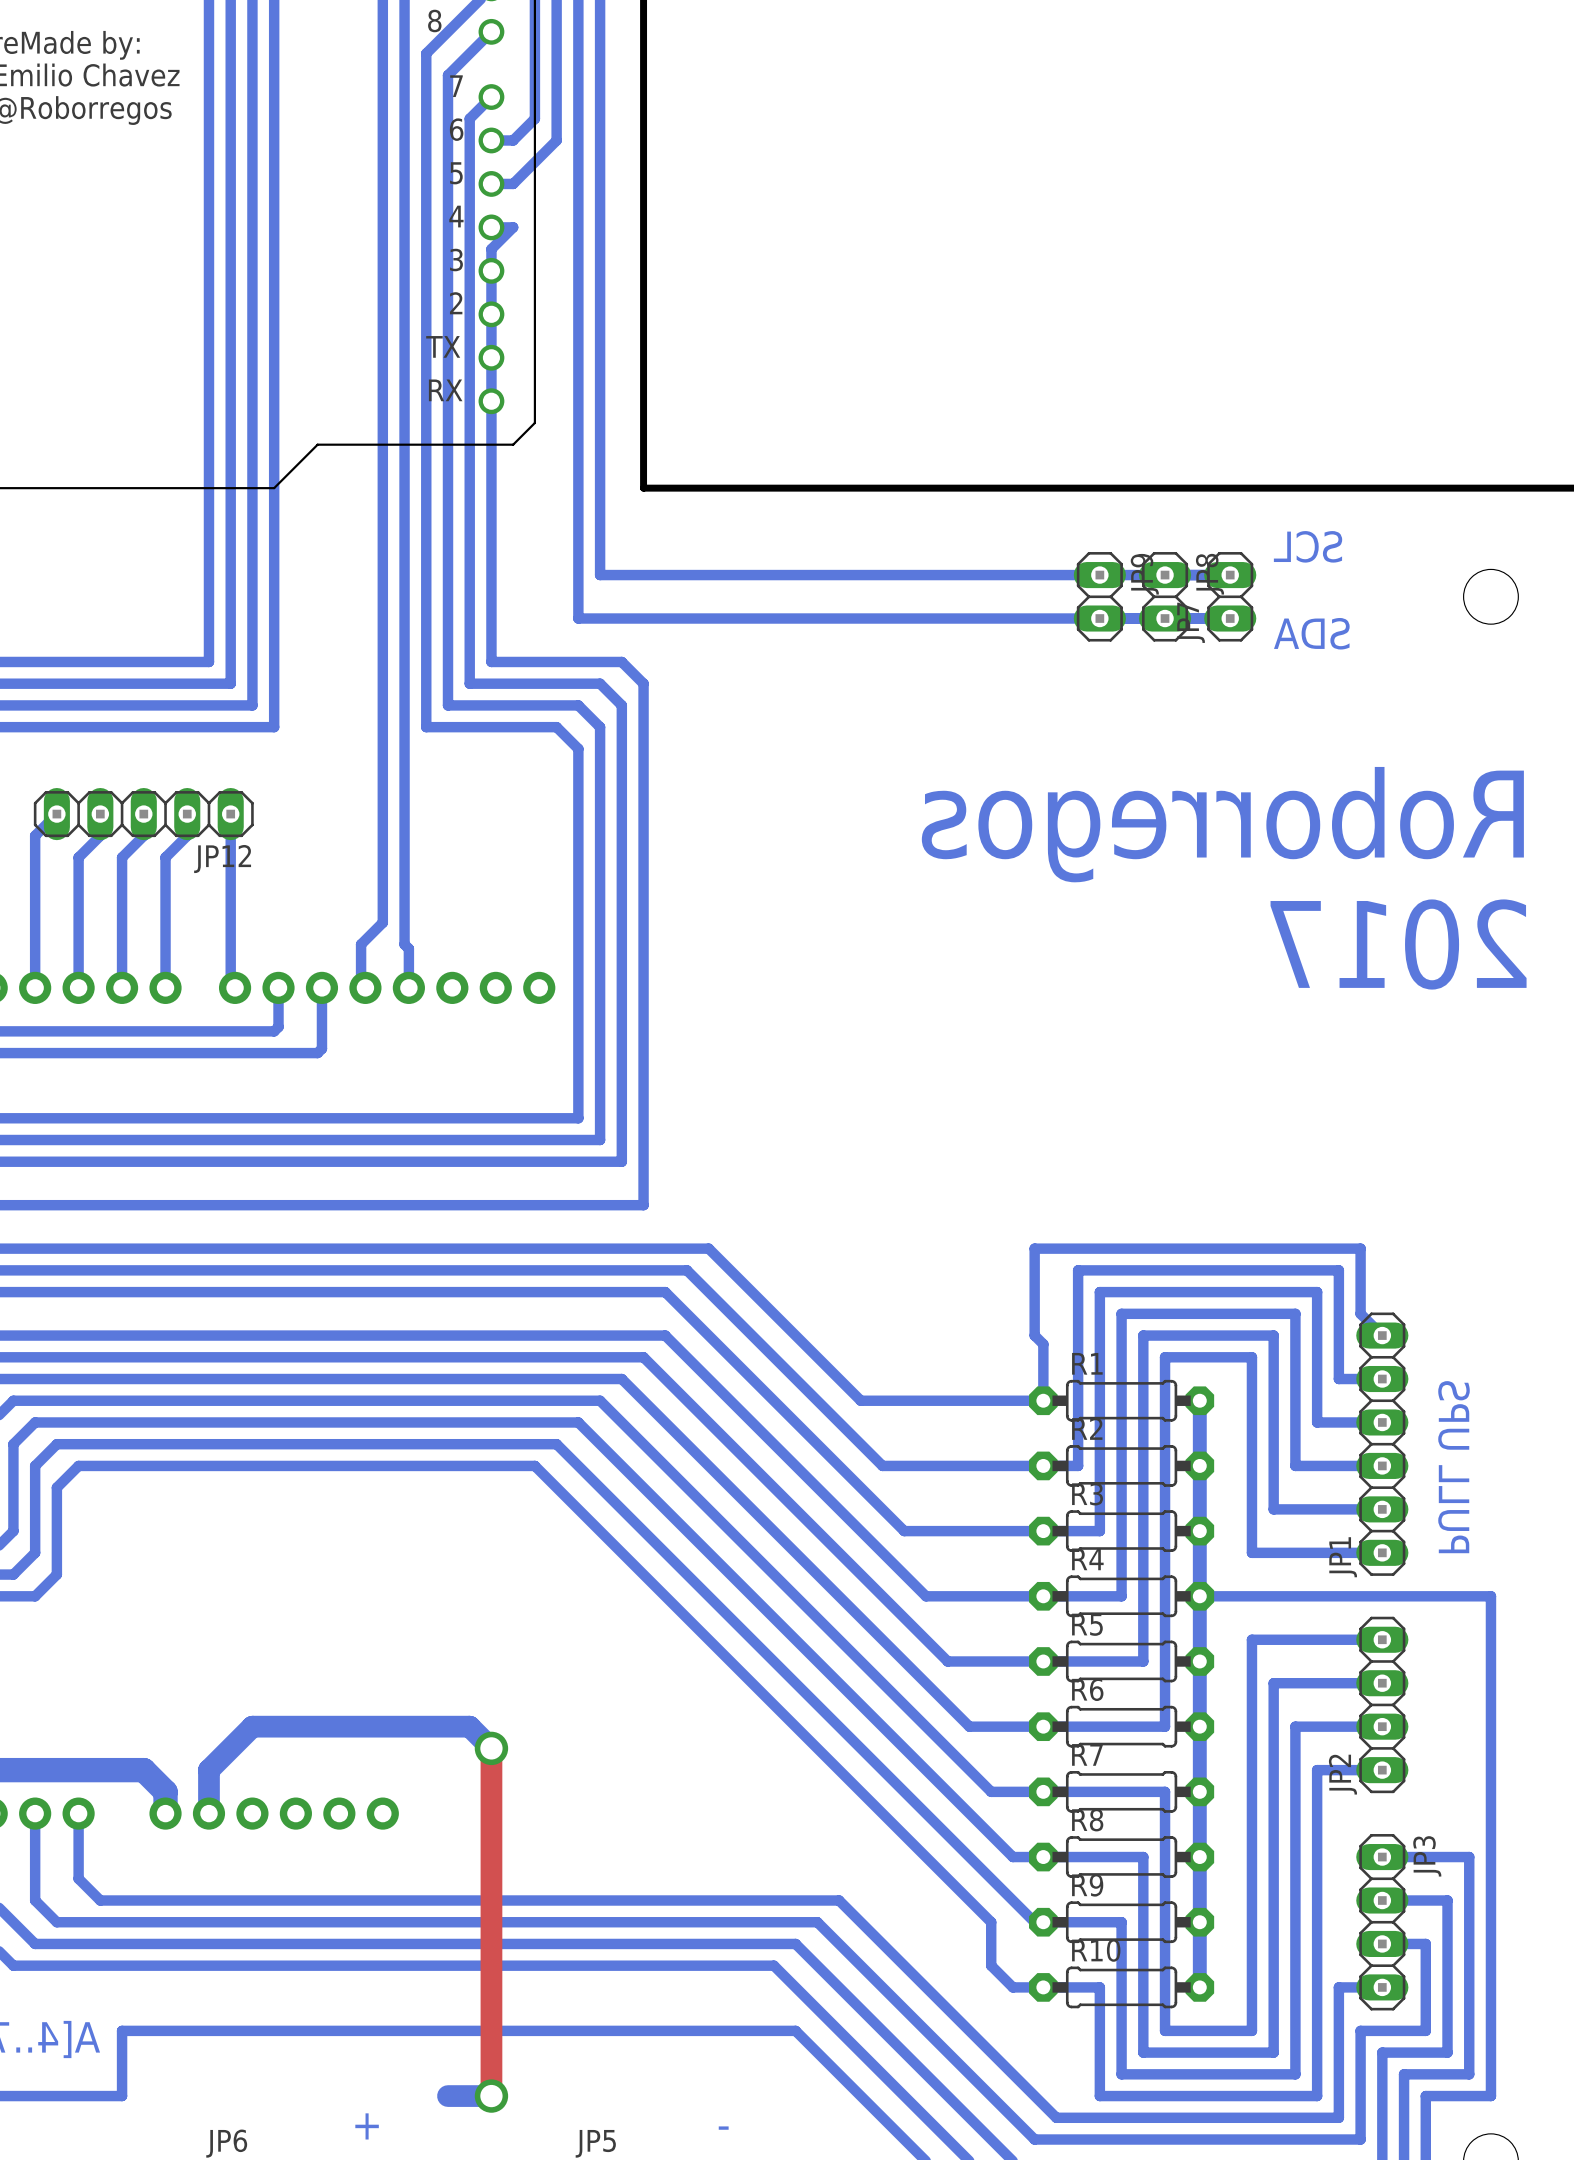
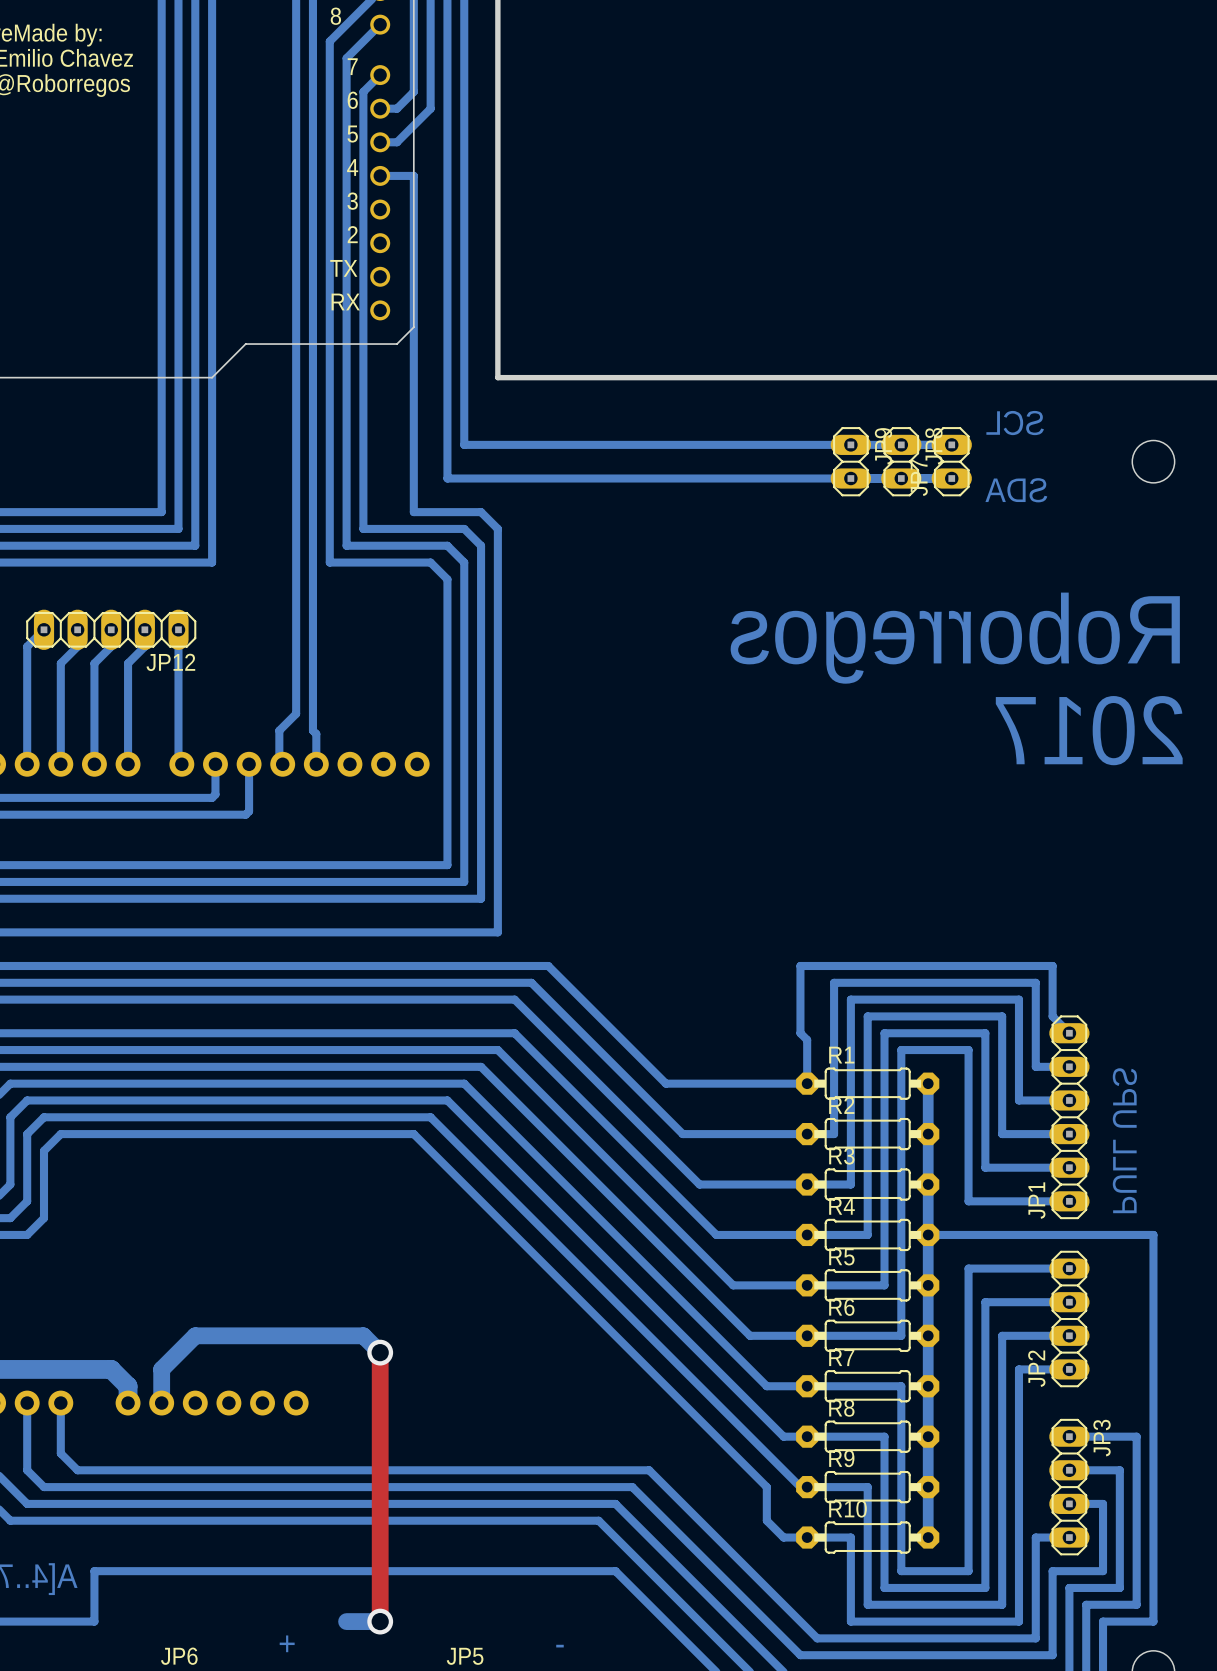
bottom track: (513, 227) (491, 249) (491, 661) (534, 661) -> (397, 175) (413, 175) (413, 512)

